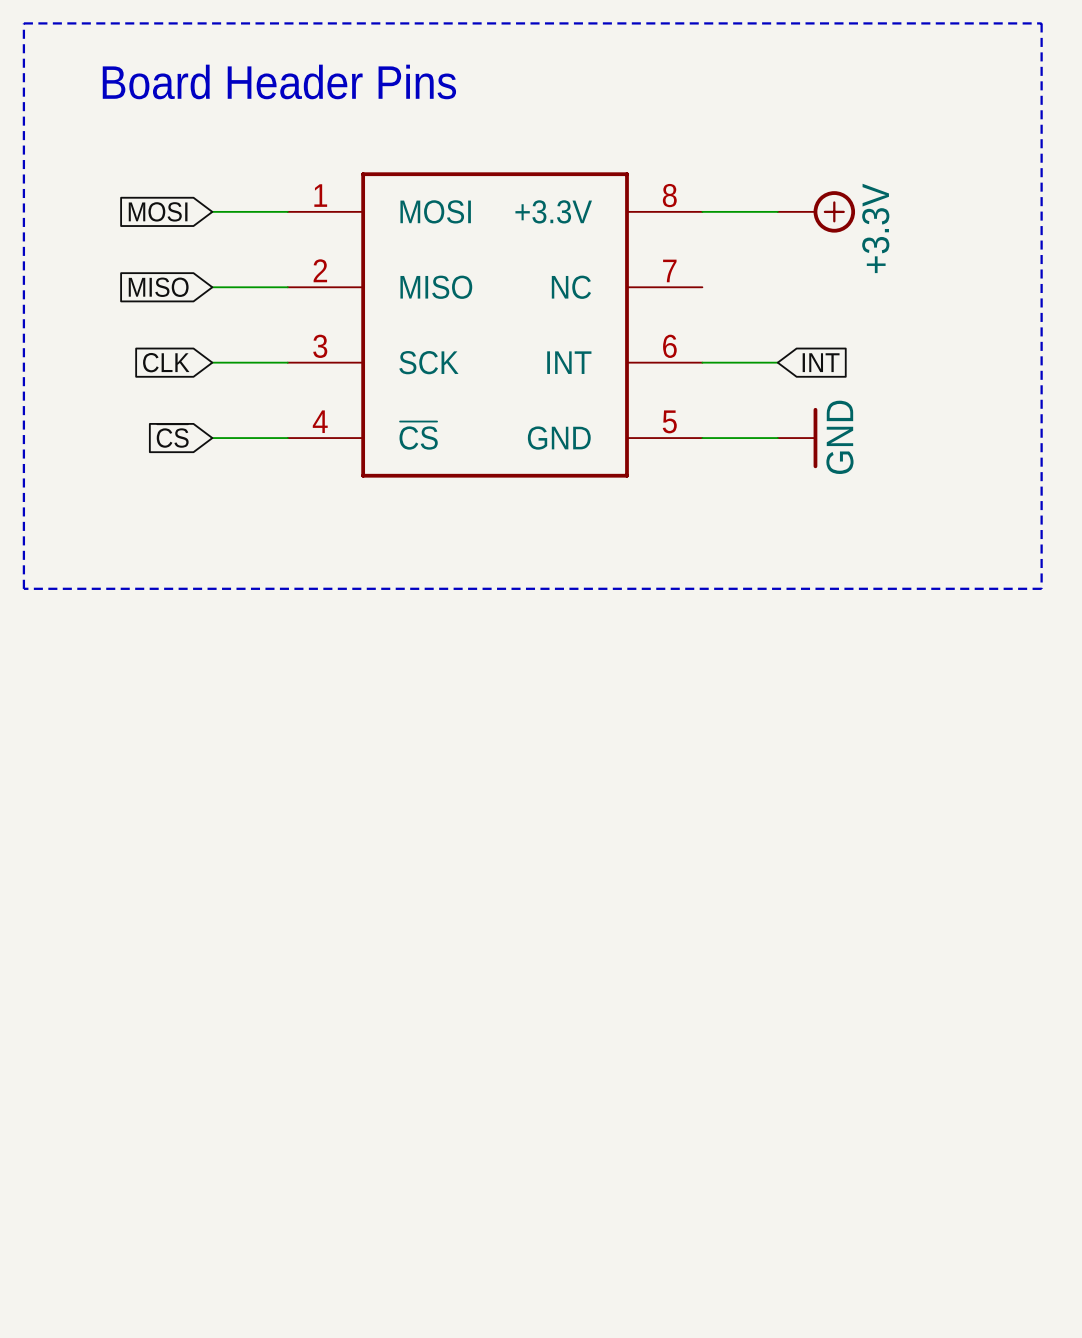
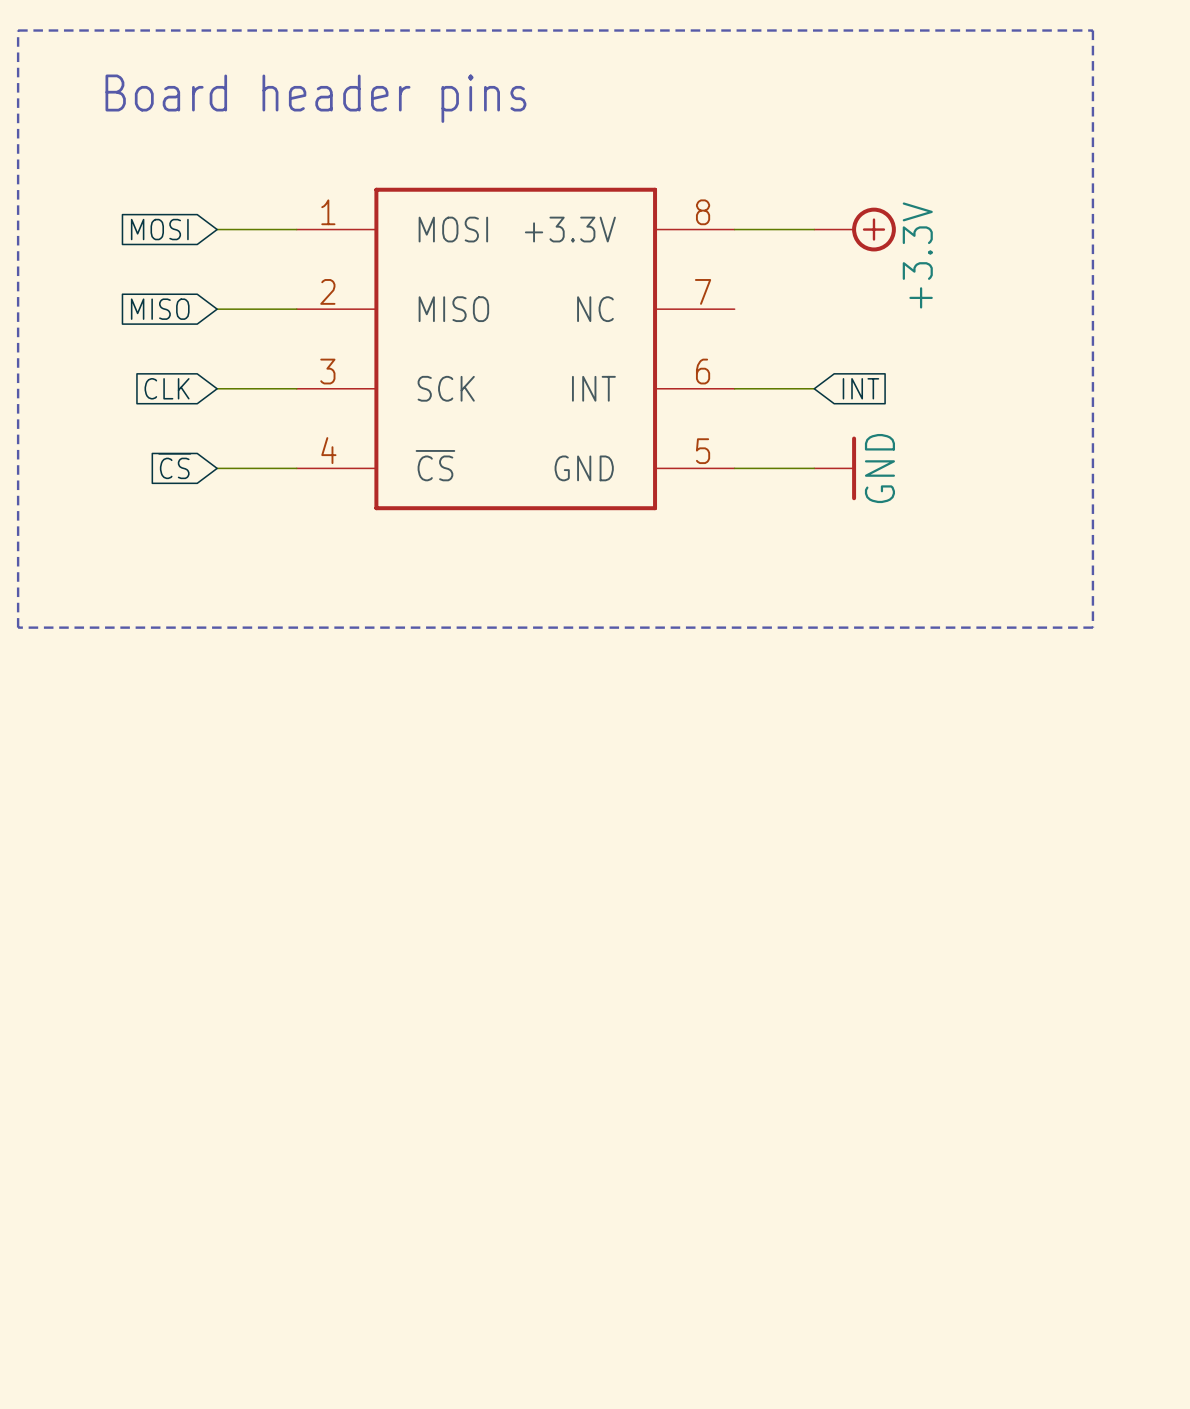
text: Board Header Pins (279, 81) -> Board header pins (315, 98)

